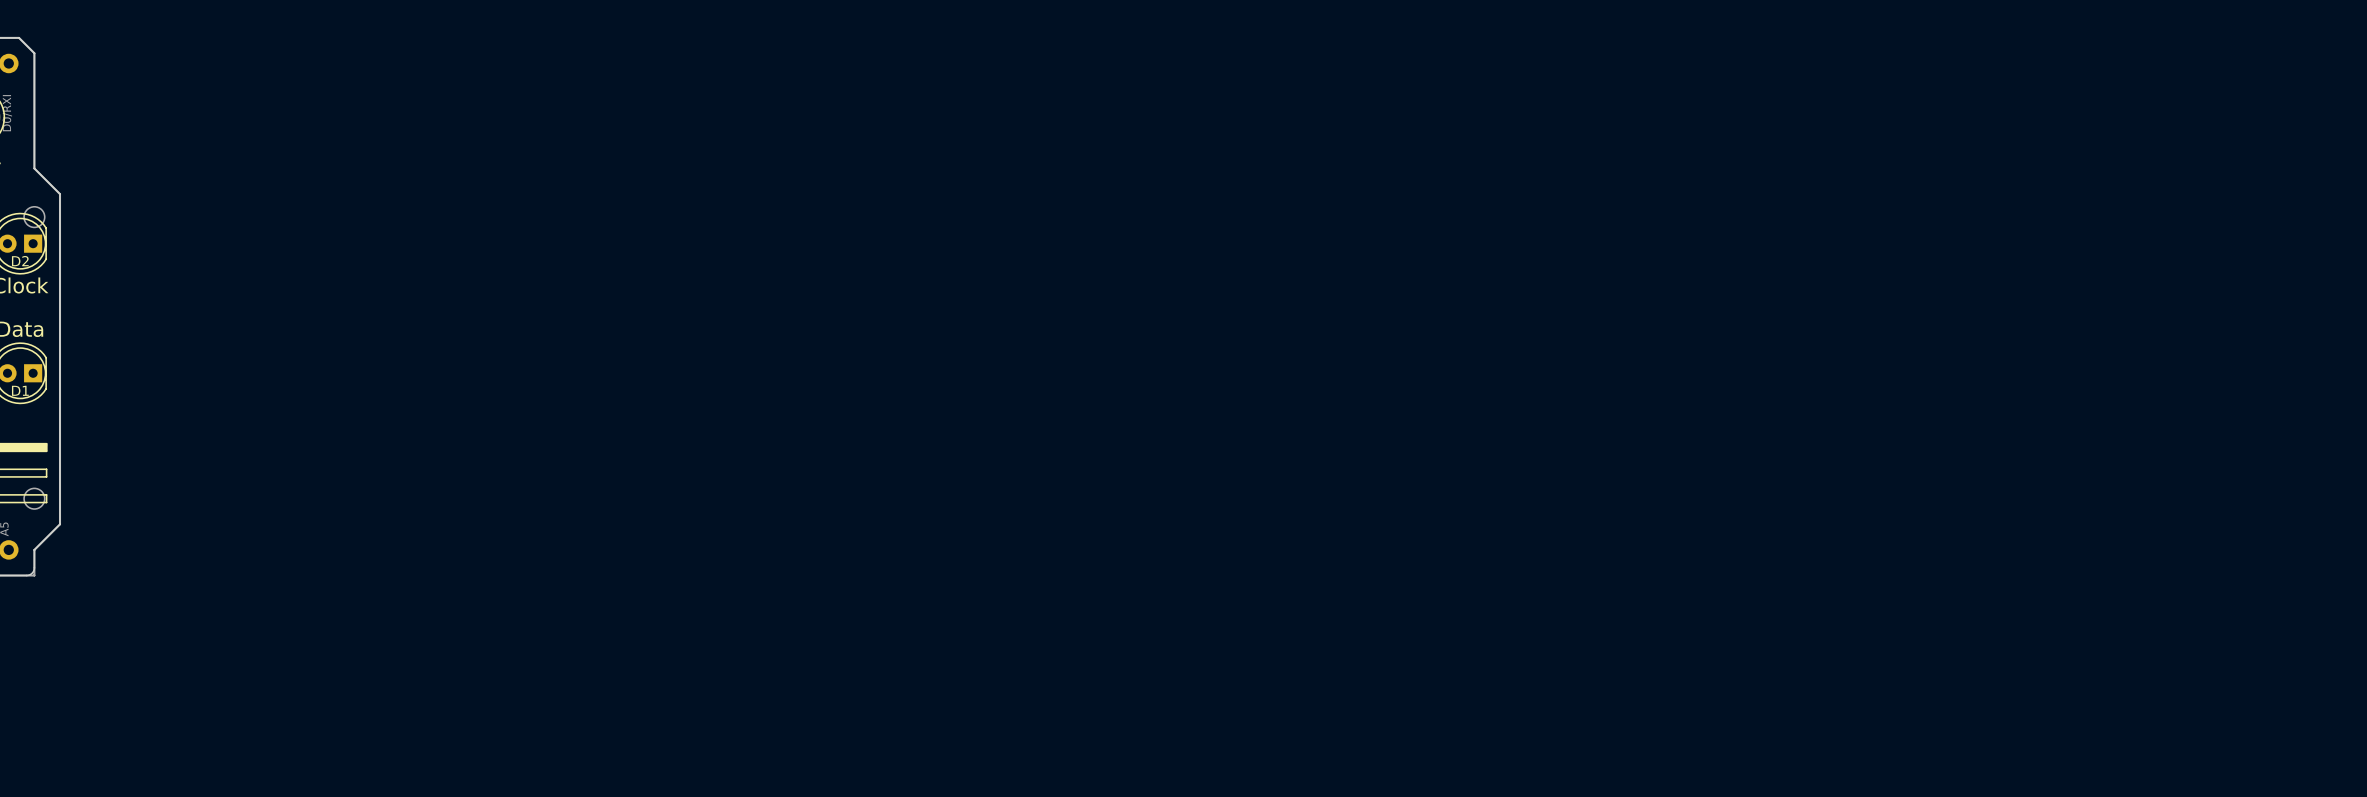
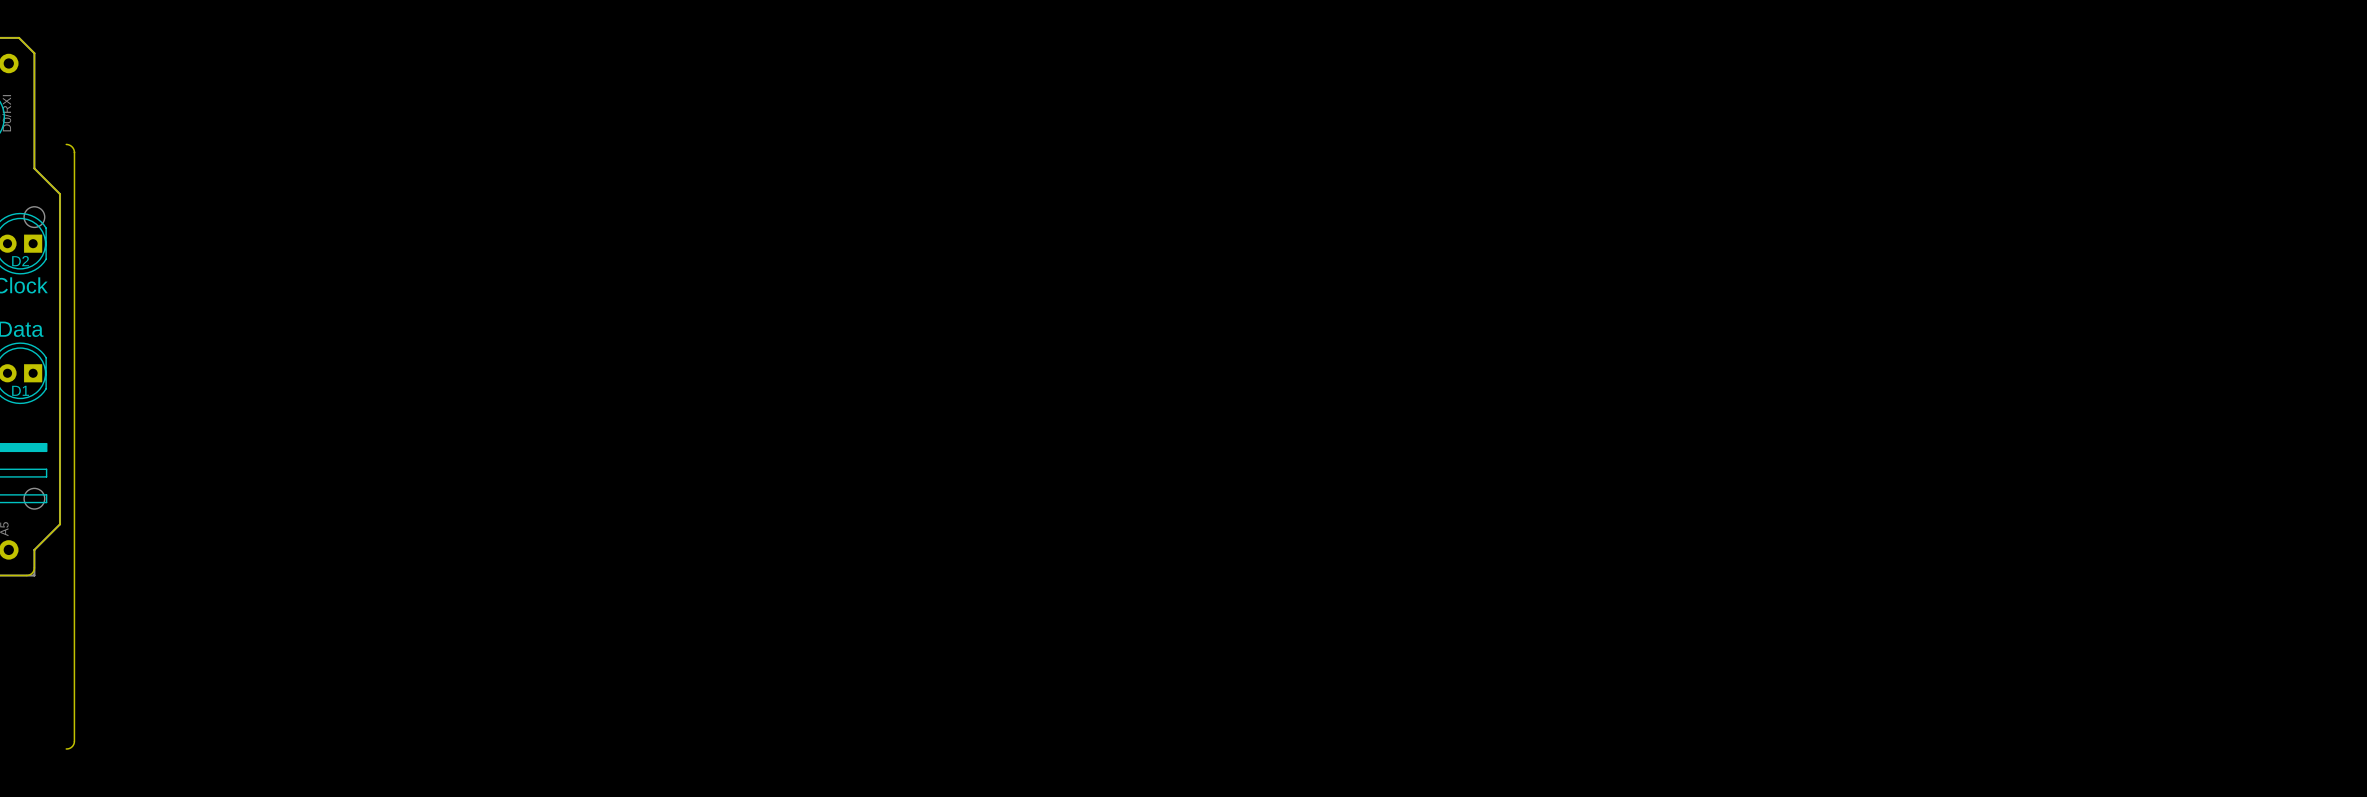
board edge: none -> (66, 144) (72, 146) (74, 152)
board edge: none -> (74, 152) (74, 741)
board edge: none -> (74, 741) (71, 747) (66, 748)

